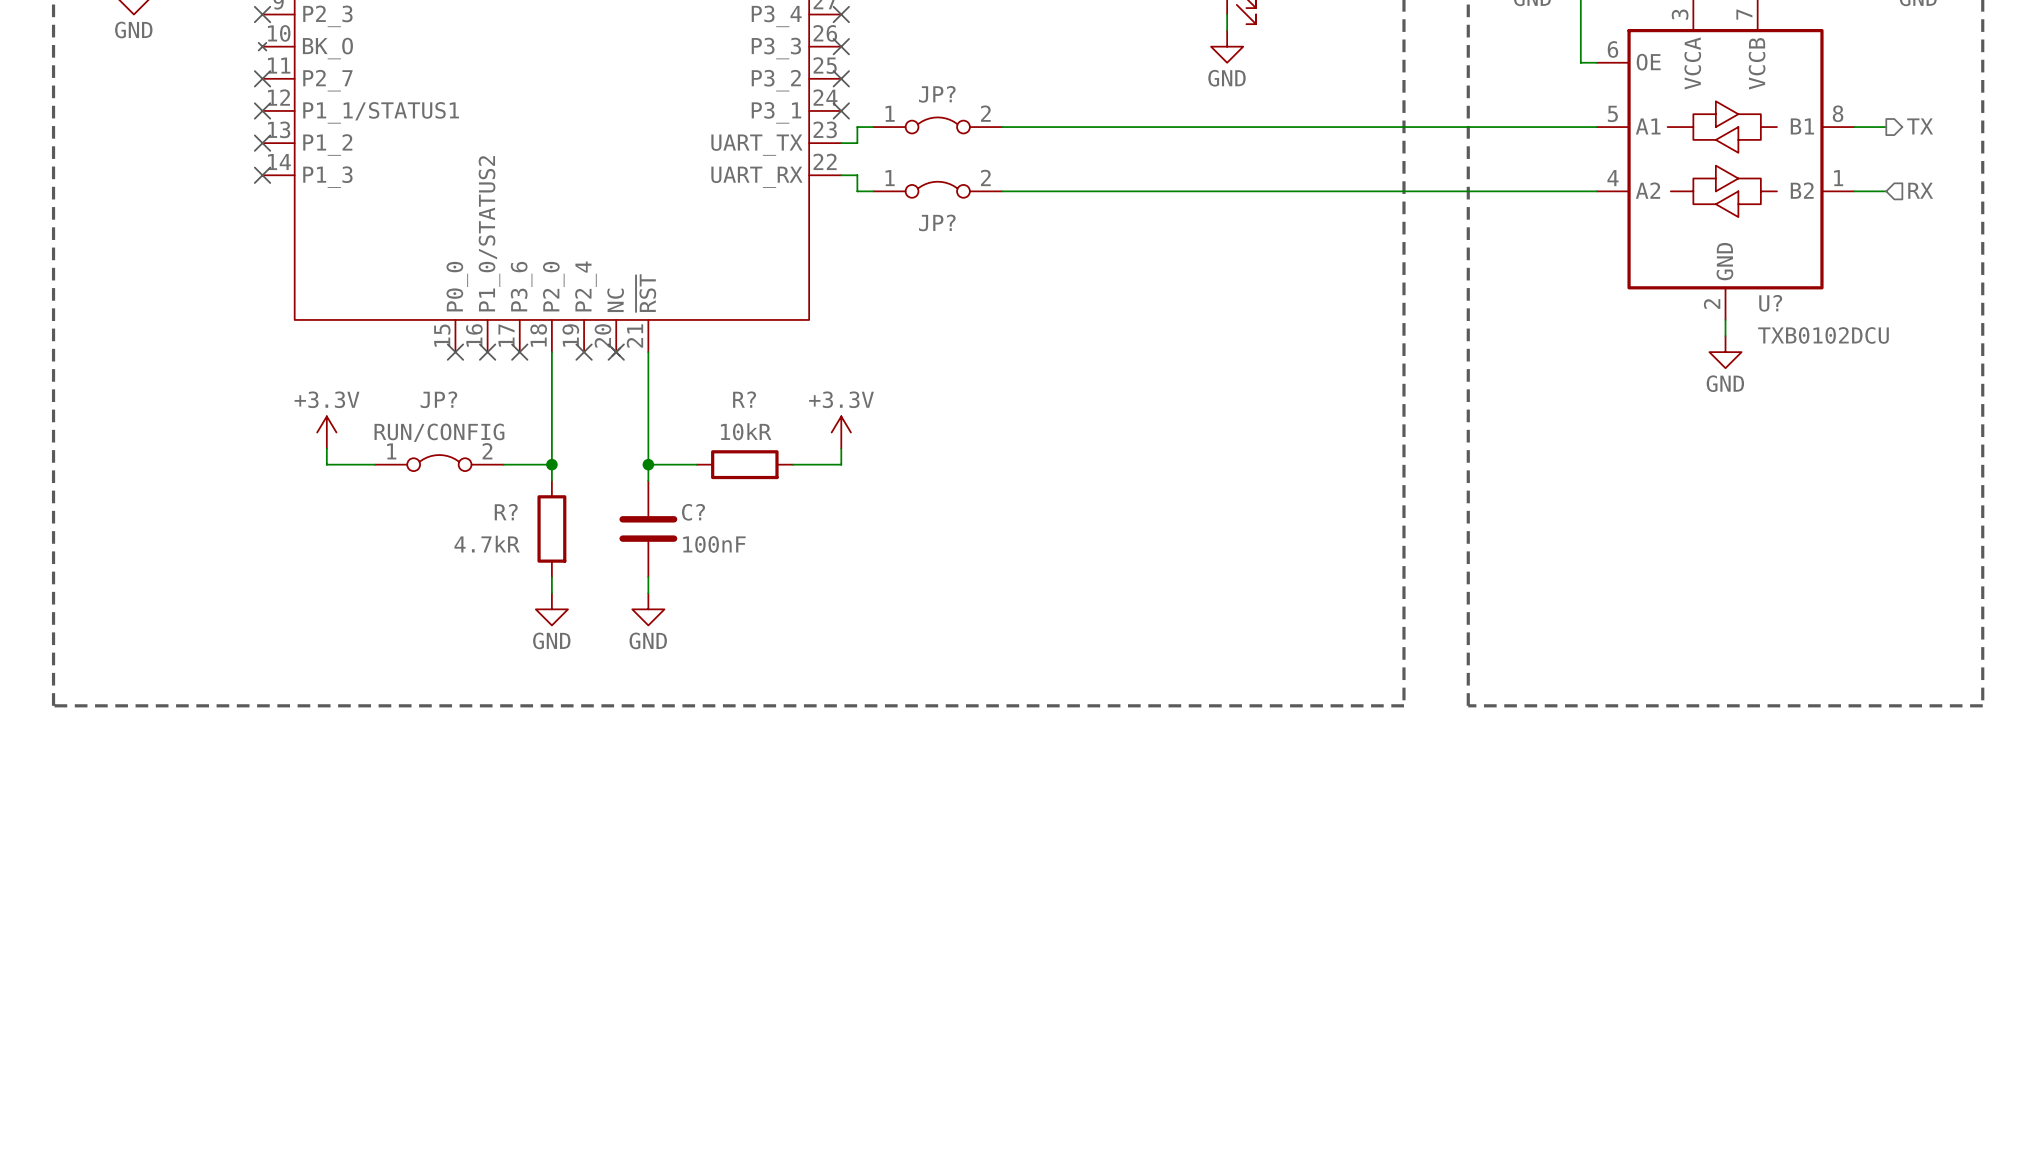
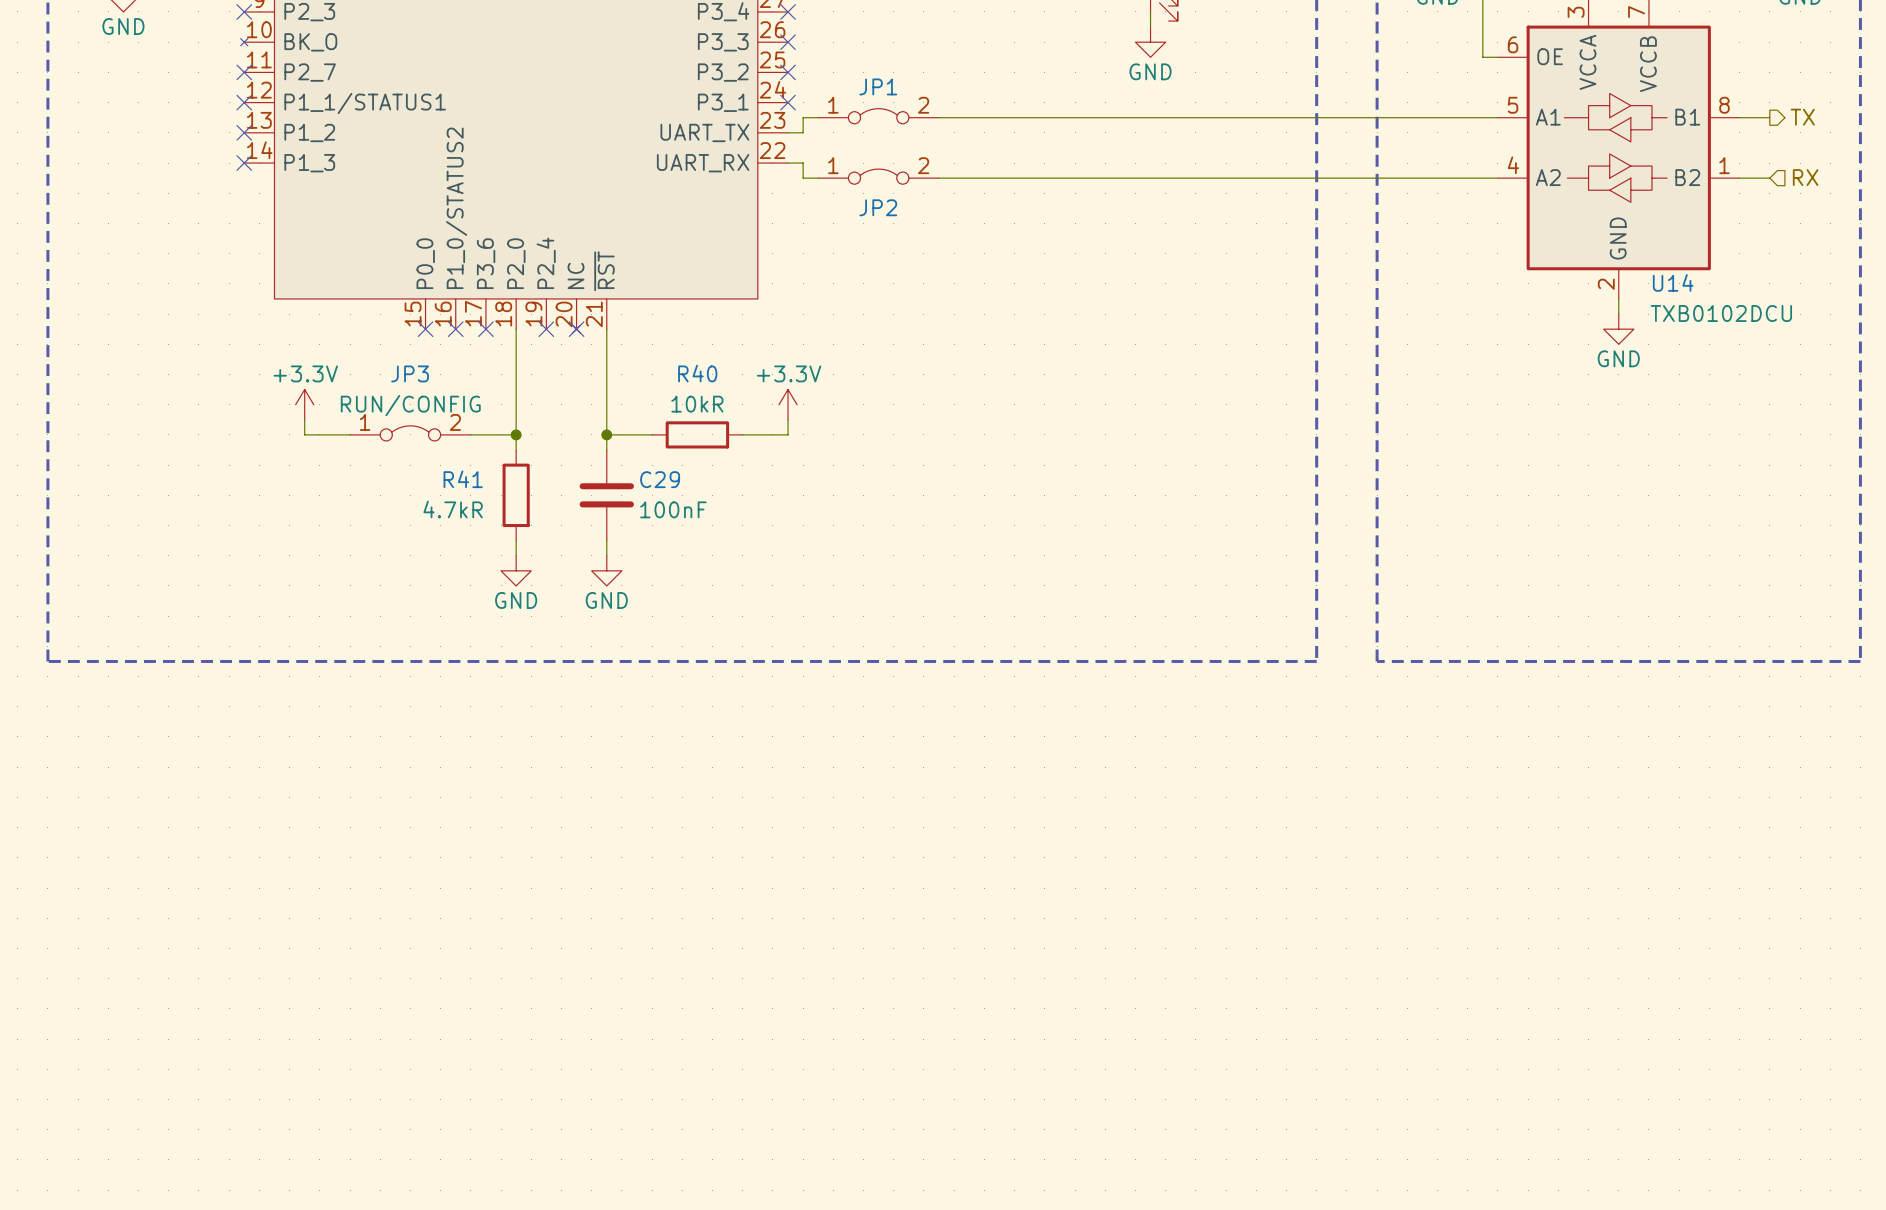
JP? name: JP? (937, 94) -> JP1 (878, 86)
JP? name: JP? (937, 222) -> JP2 (878, 207)
U? name: U? (1770, 303) -> U14 (1673, 282)
JP? name: JP? (438, 399) -> JP3 (410, 373)
R? name: R? (744, 399) -> R40 (697, 373)
R? name: R? (506, 512) -> R41 (463, 479)
C? name: C? (693, 512) -> C29 (660, 479)

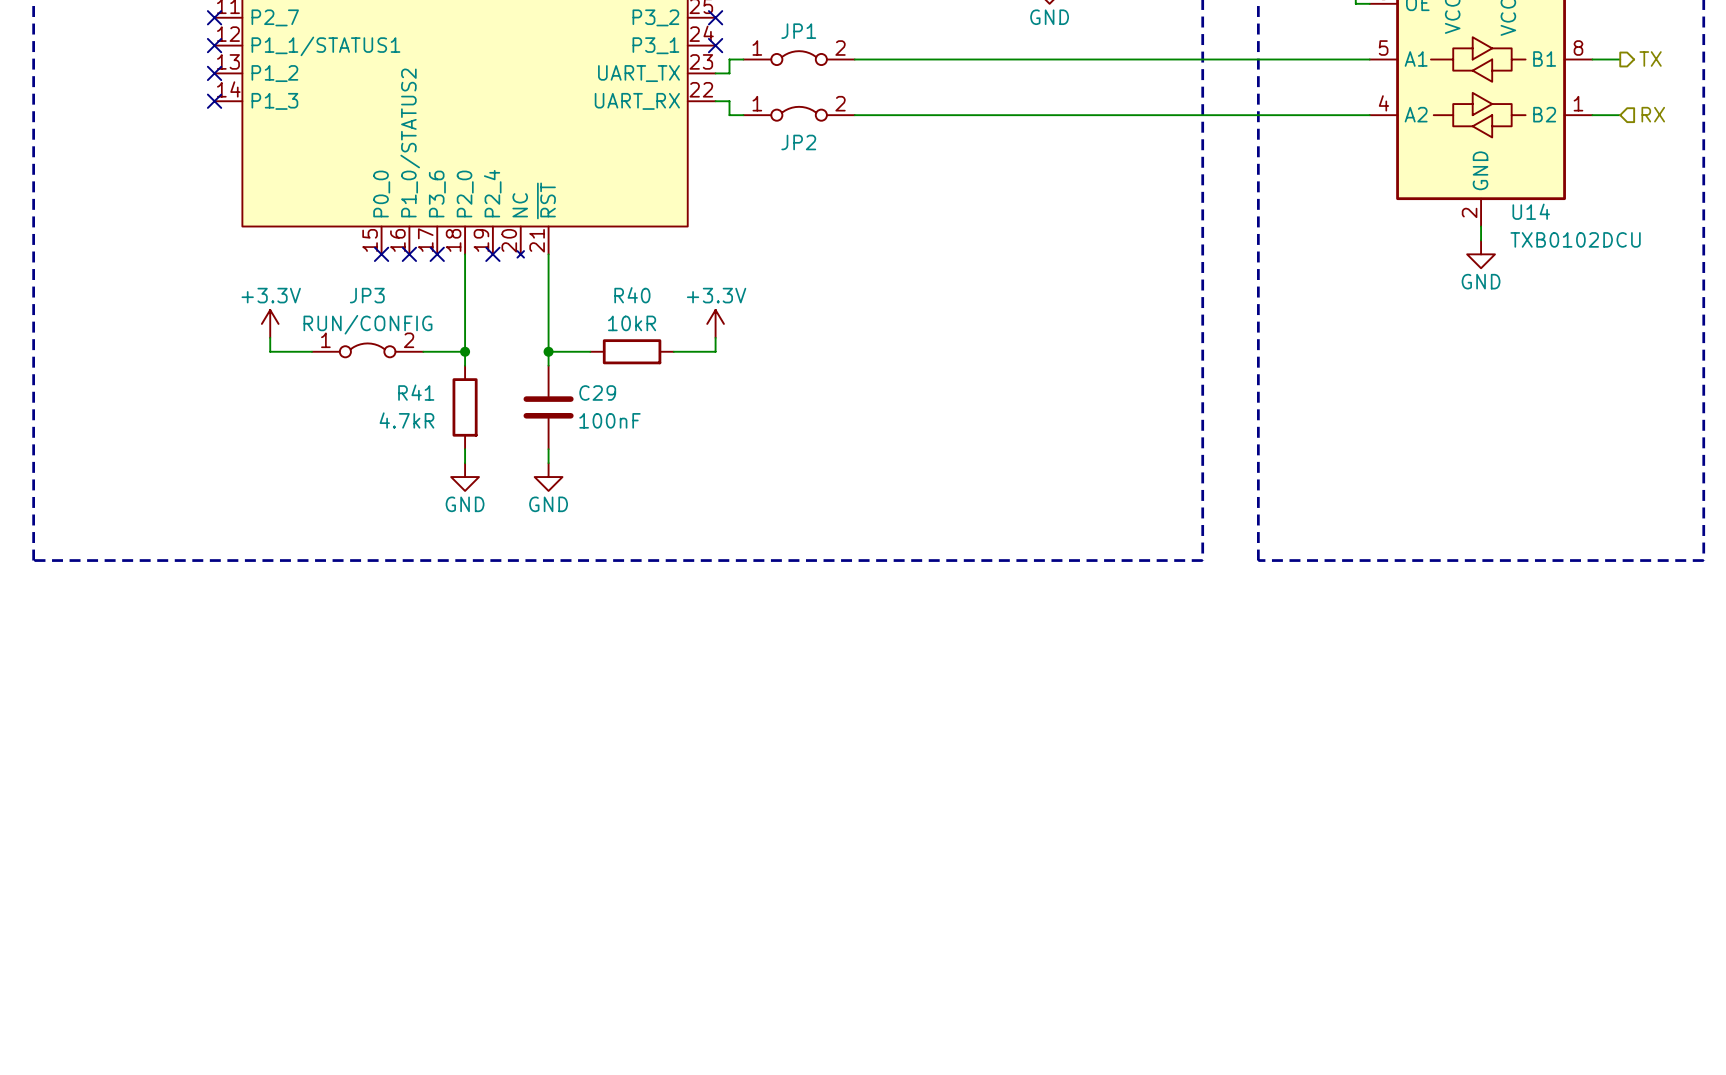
no-connect mark: (576, 329) -> none

